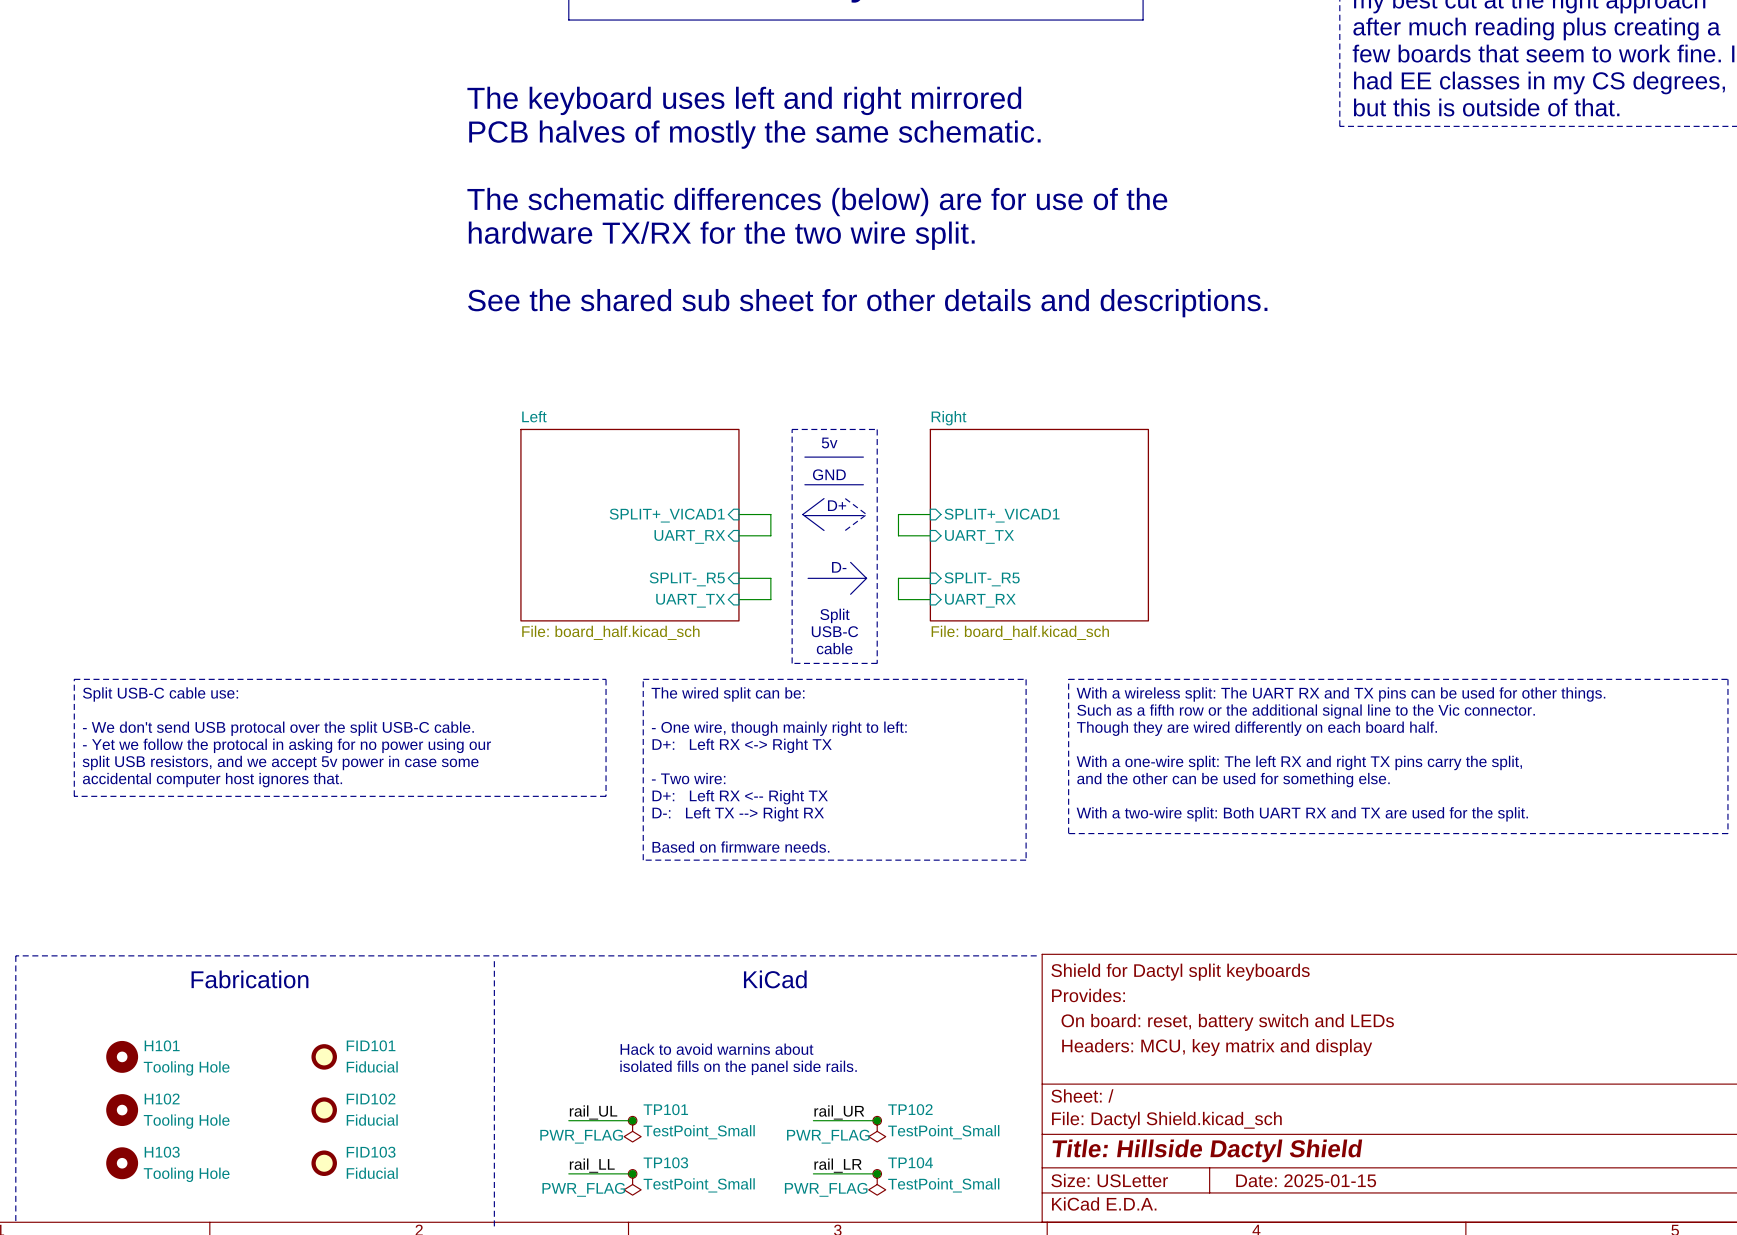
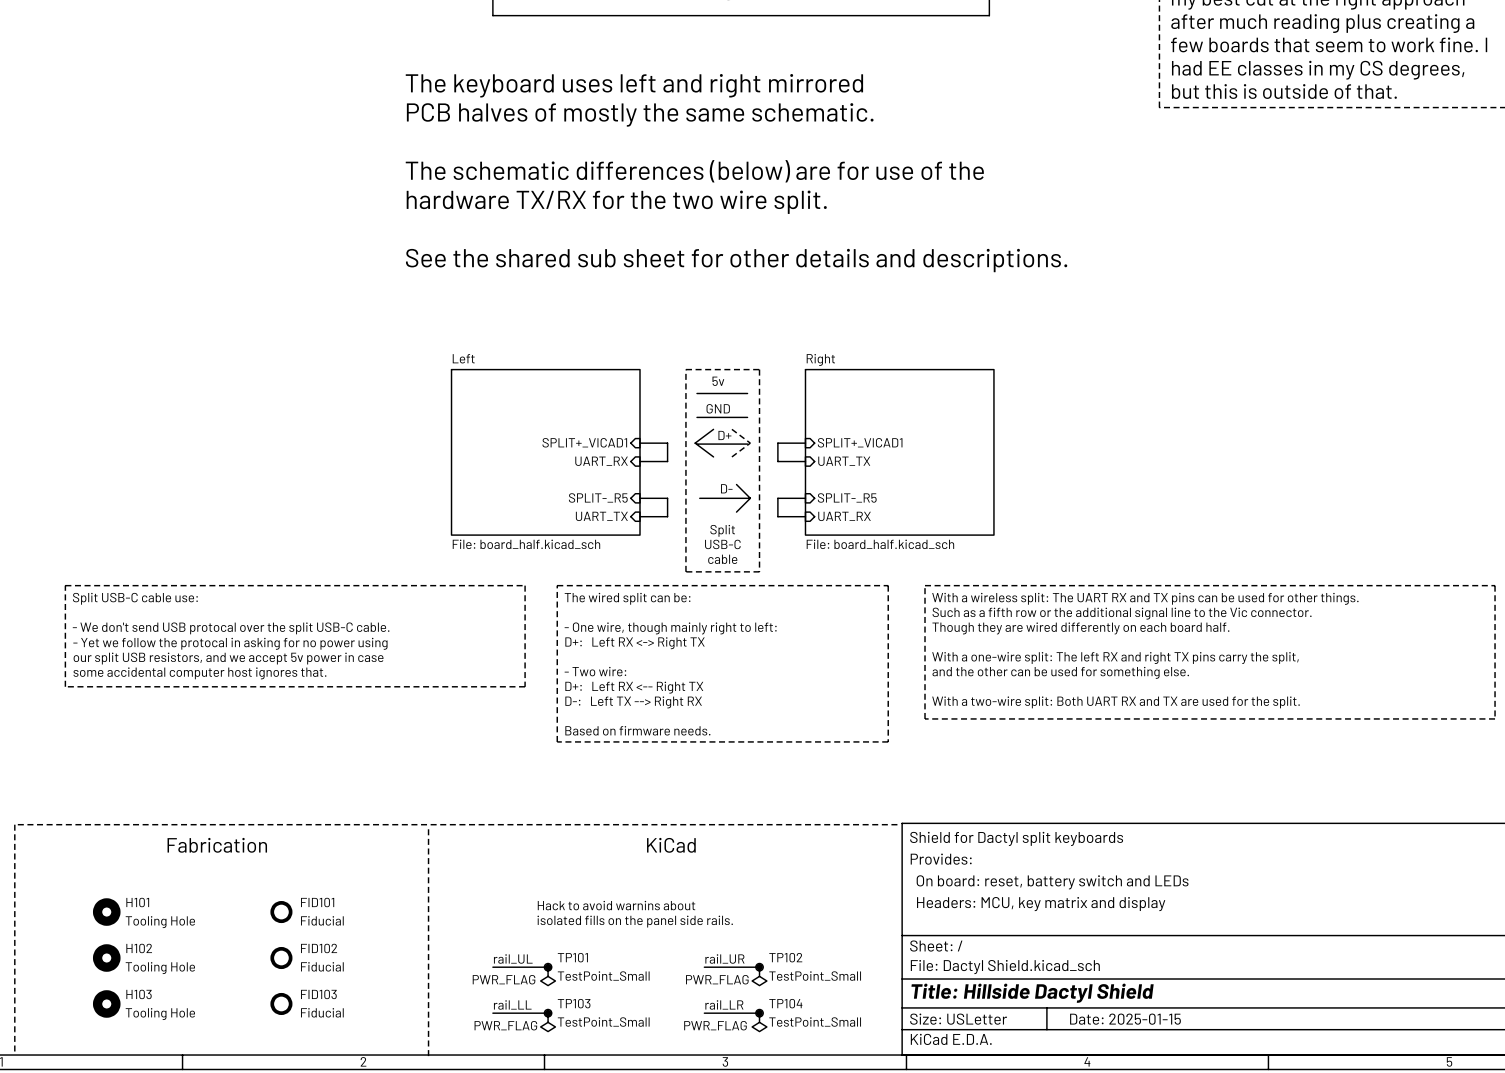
text: - Yet we follow the protocal in asking for no power using our (286, 745) -> - Yet we follow the protocal in asking for no power using (230, 643)
text: split USB resistors, and we accept 5v power in case some (280, 762) -> our split USB resistors, and we accept 5v power in case (228, 658)
text: accidental computer host ignores that. (212, 780) -> some accidental computer host ignores that. (199, 673)

